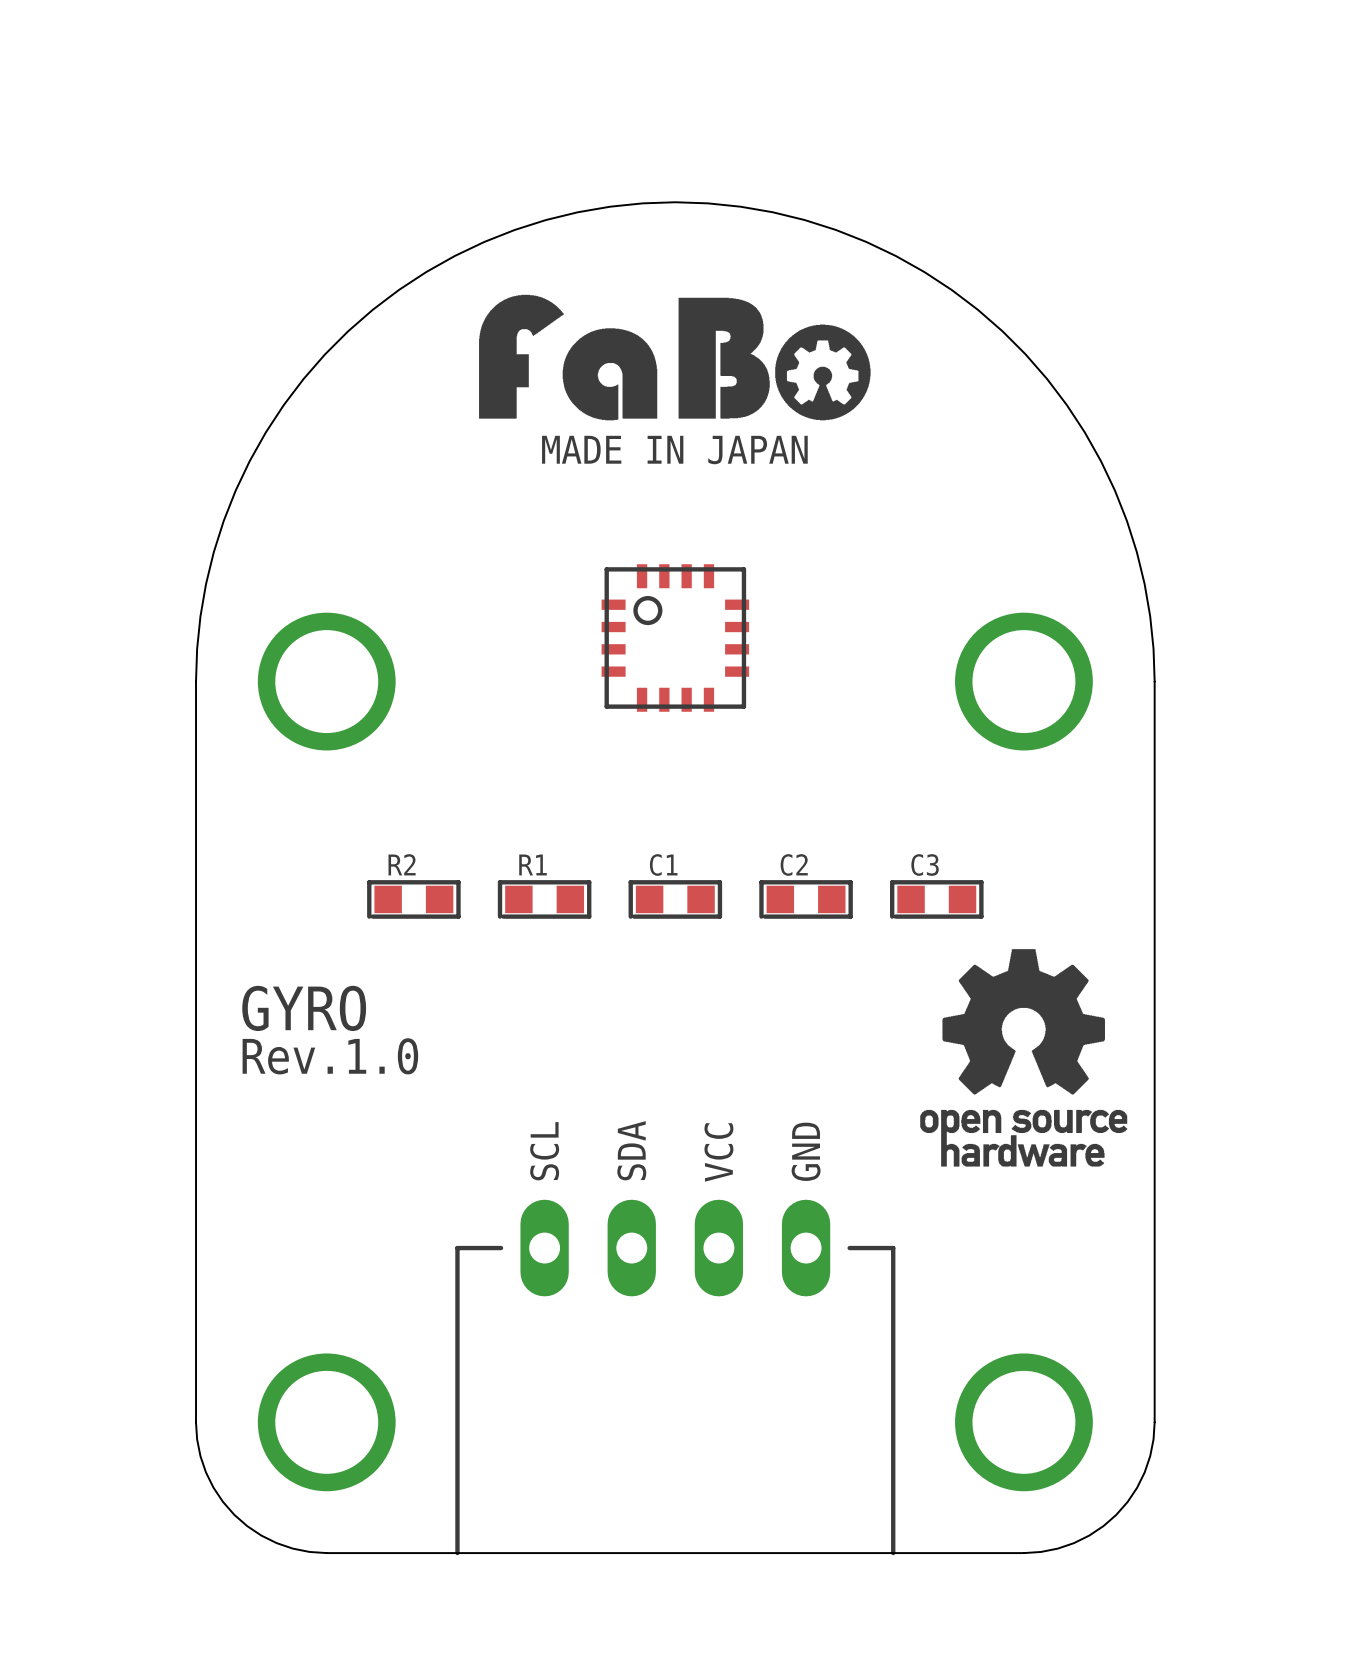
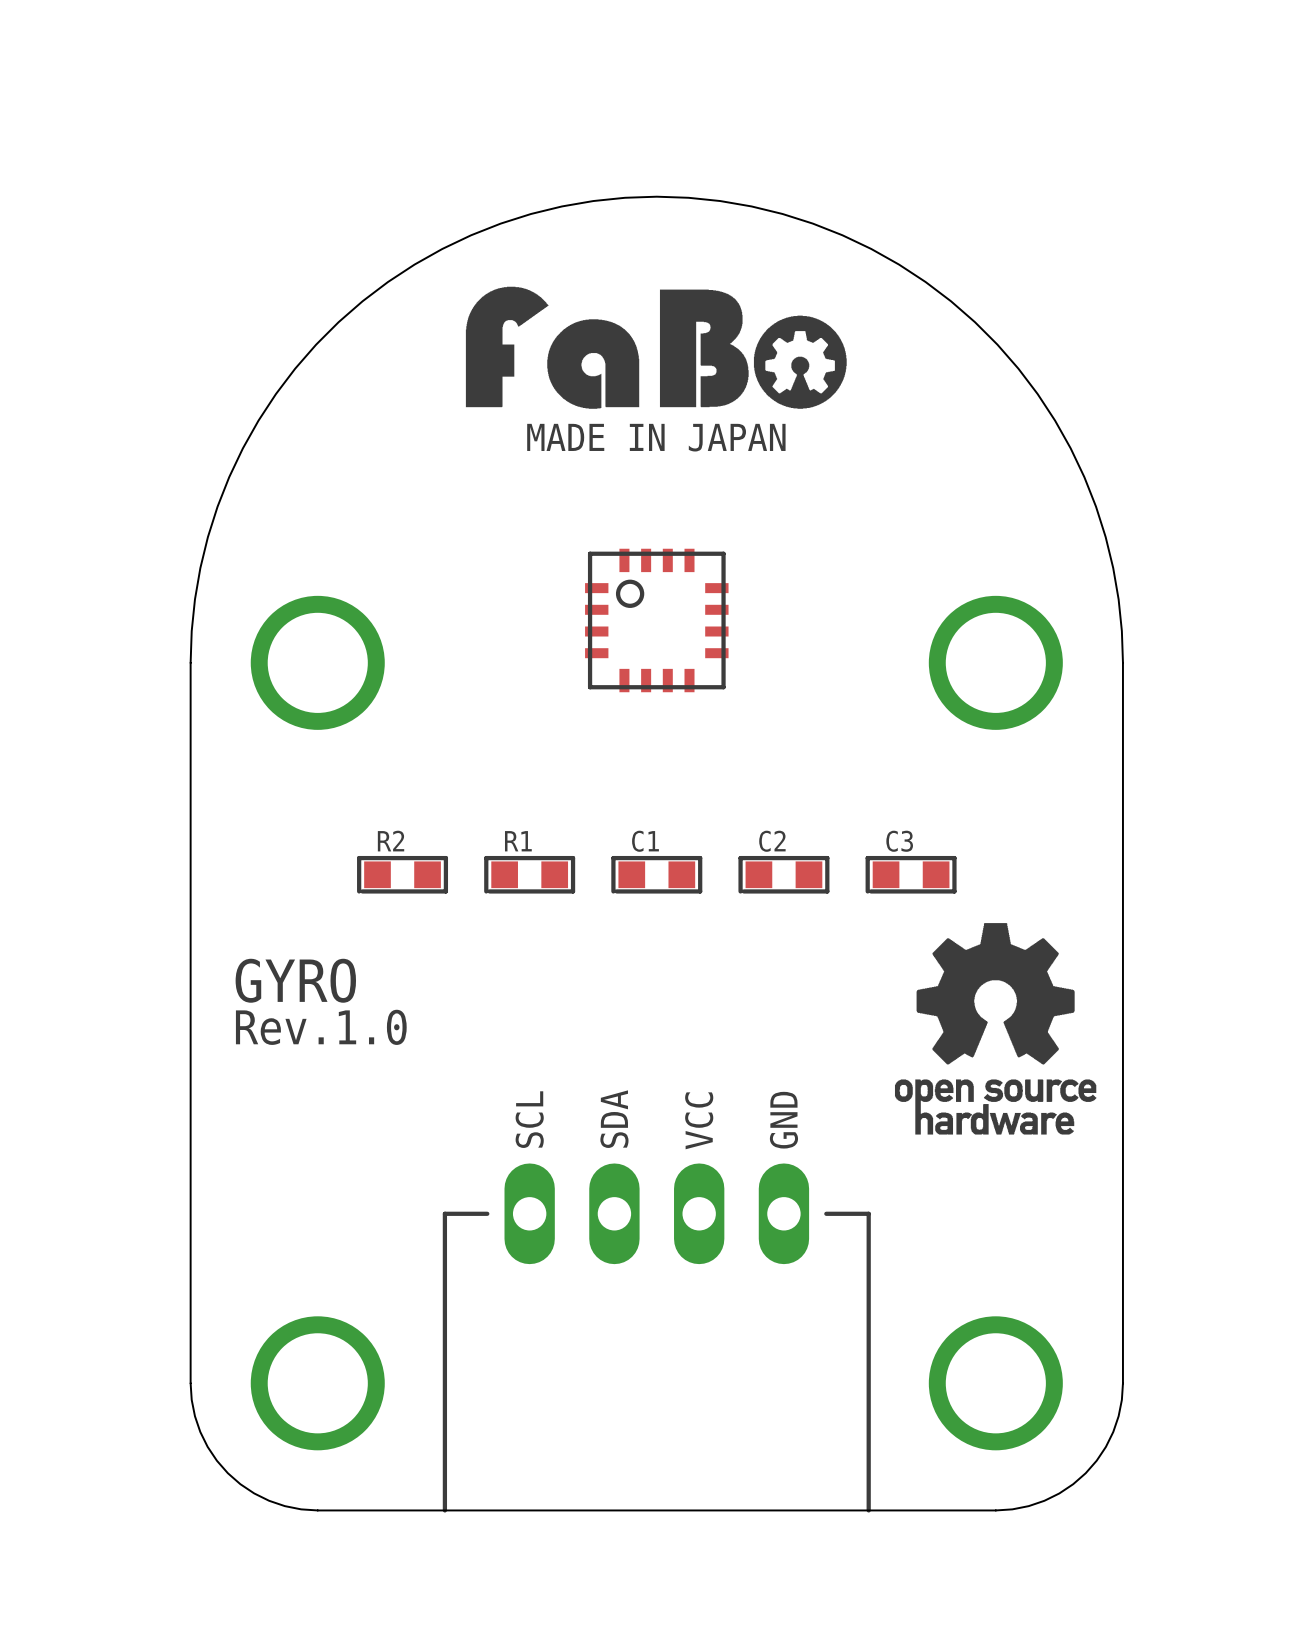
part footprint: [196, 202, 1155, 1556] -> [190, 196, 1123, 1513]

